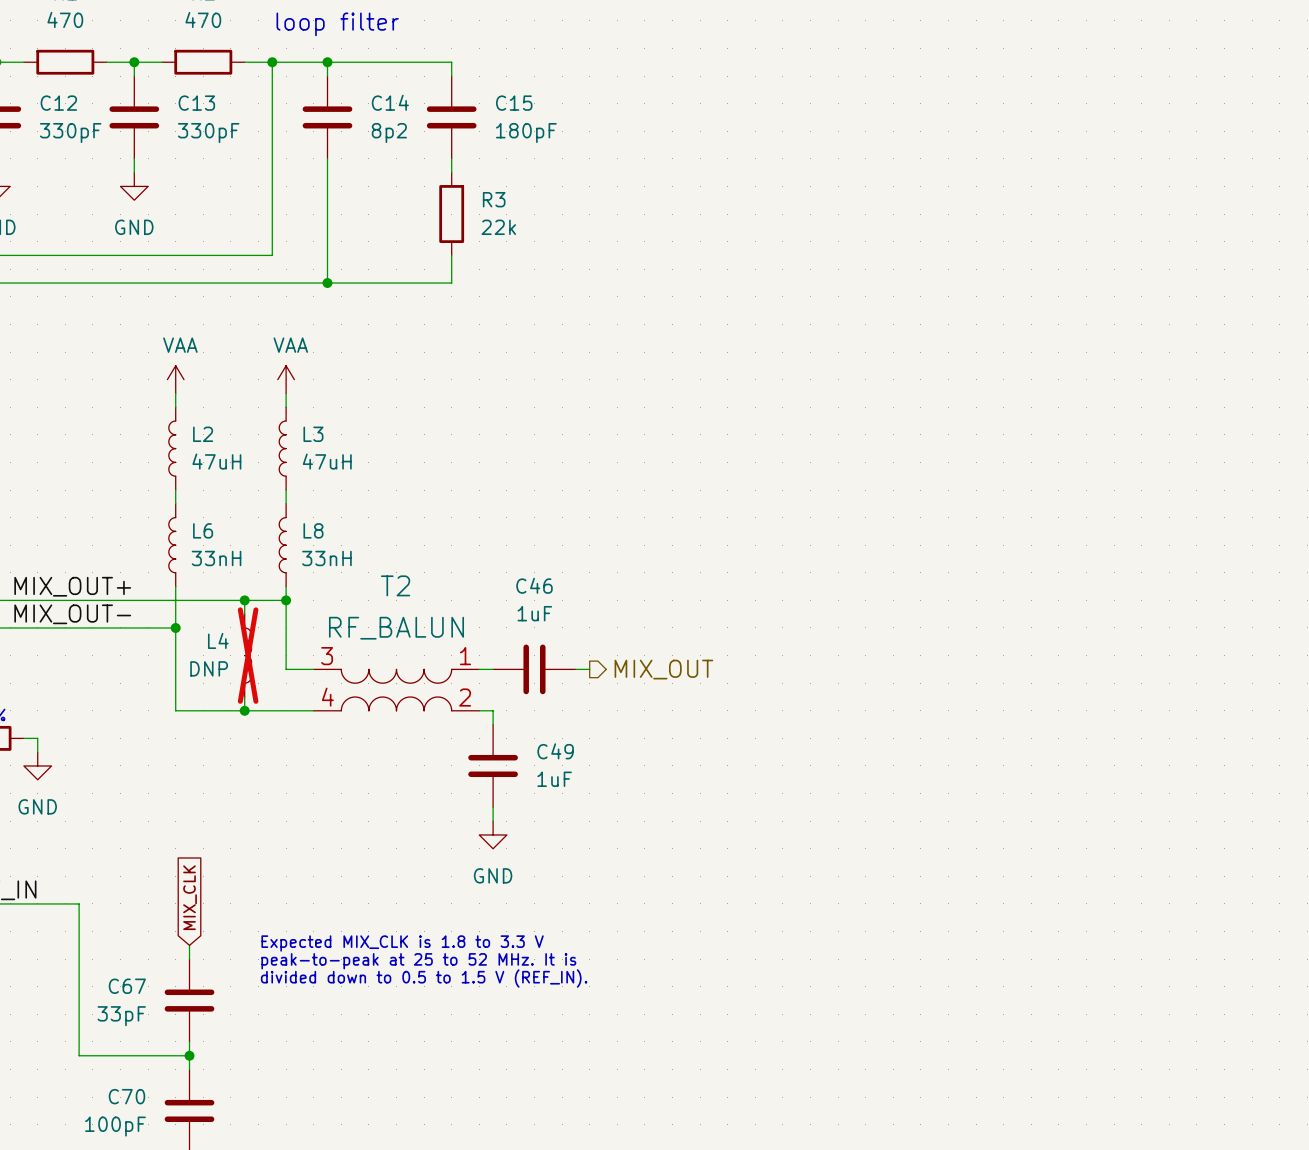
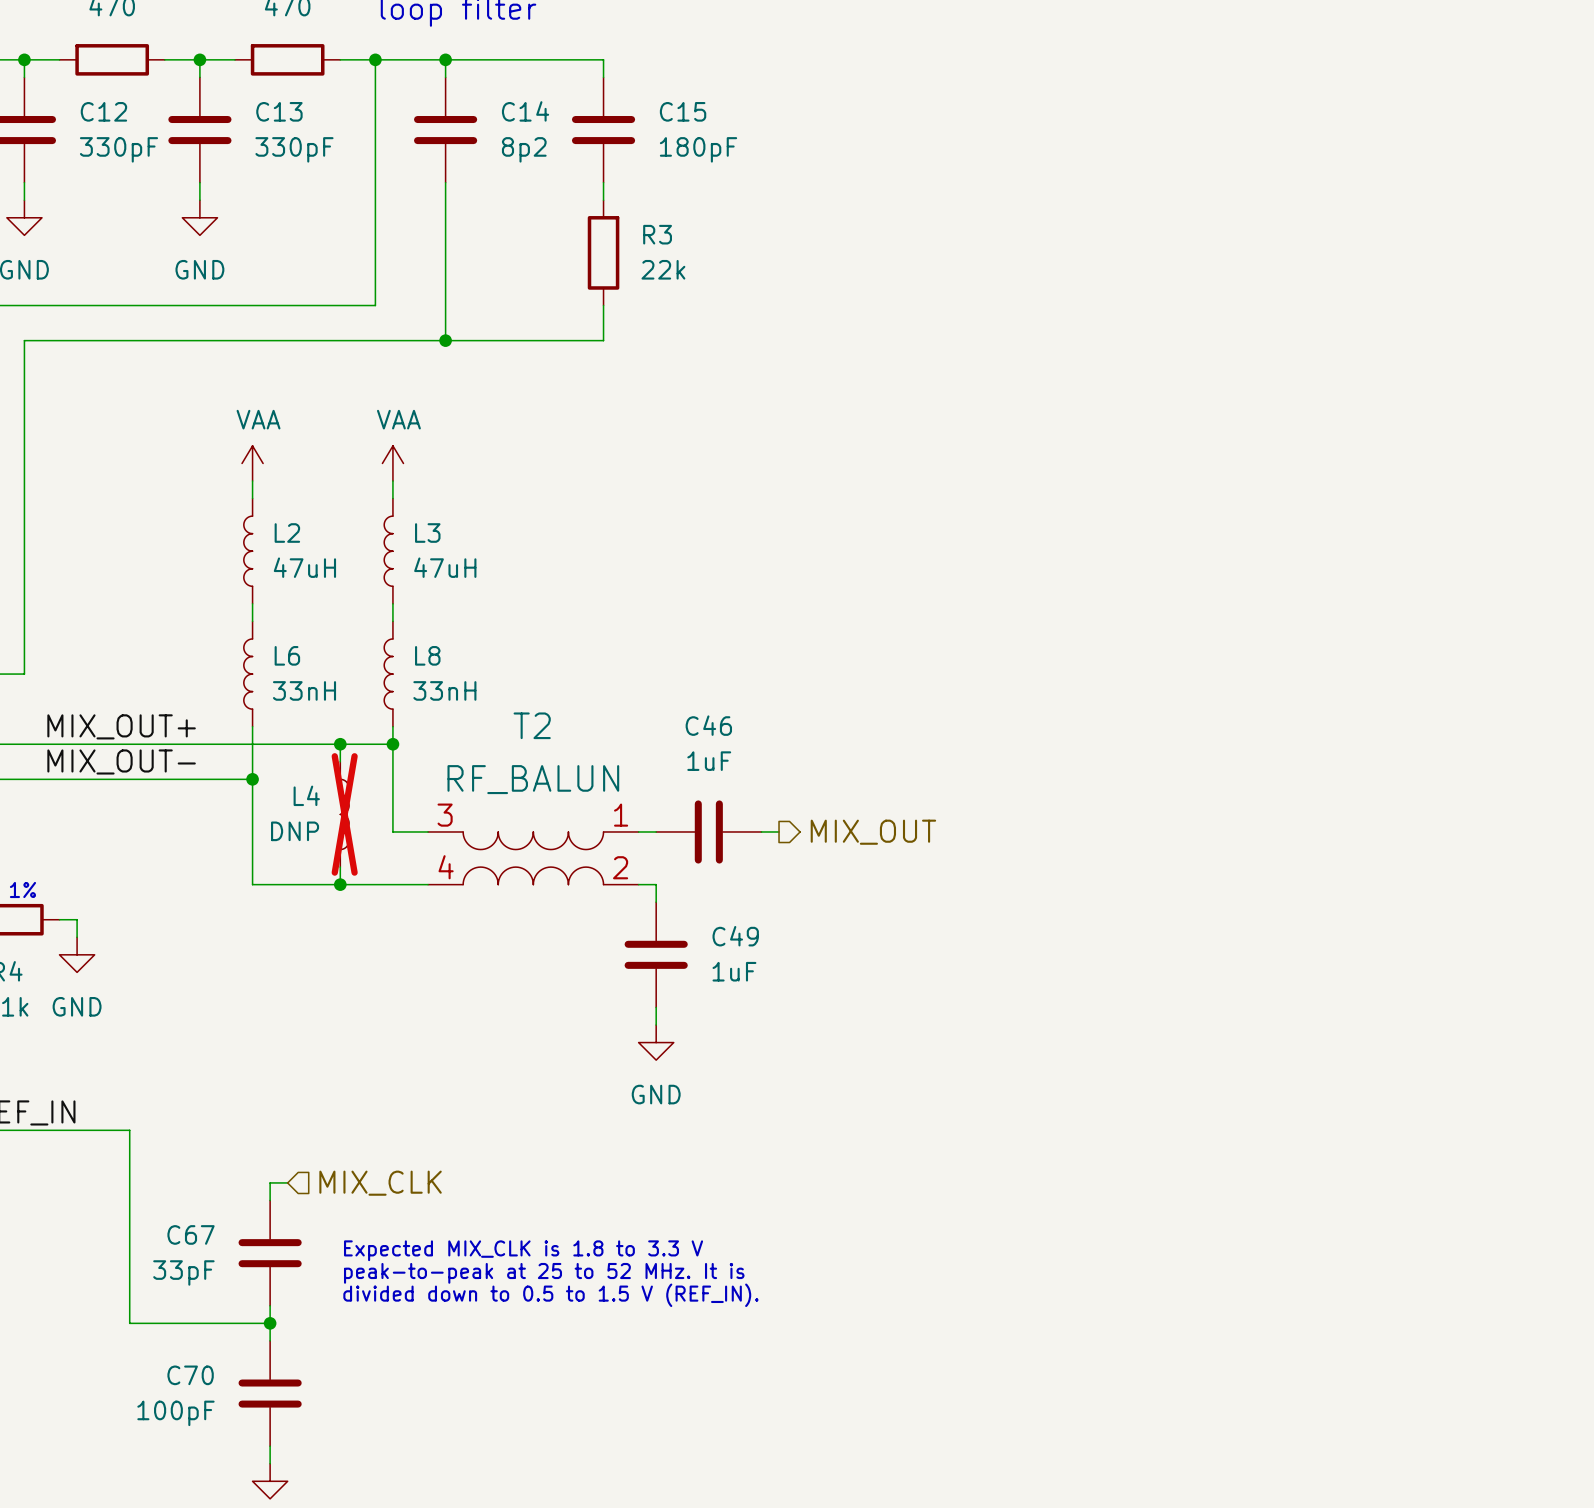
global label: MIX_CLK (190, 897) -> none
text position: Expected MIX_CLK is 1.8 to 3.3 V (402, 943) -> Expected MIX_CLK is 1.8 to 3.3 V (523, 1250)
wire: none -> (270, 1182) (287, 1182)
hierarchical label: none -> MIX_CLK (380, 1183)
text position: peak-to-peak at 25 to 52 MHz. It is (418, 961) -> peak-to-peak at 25 to 52 MHz. It is (544, 1273)
text position: divided down to 0.5 to 1.5 V (REF_IN). (424, 978) -> divided down to 0.5 to 1.5 V (REF_IN). (550, 1295)

